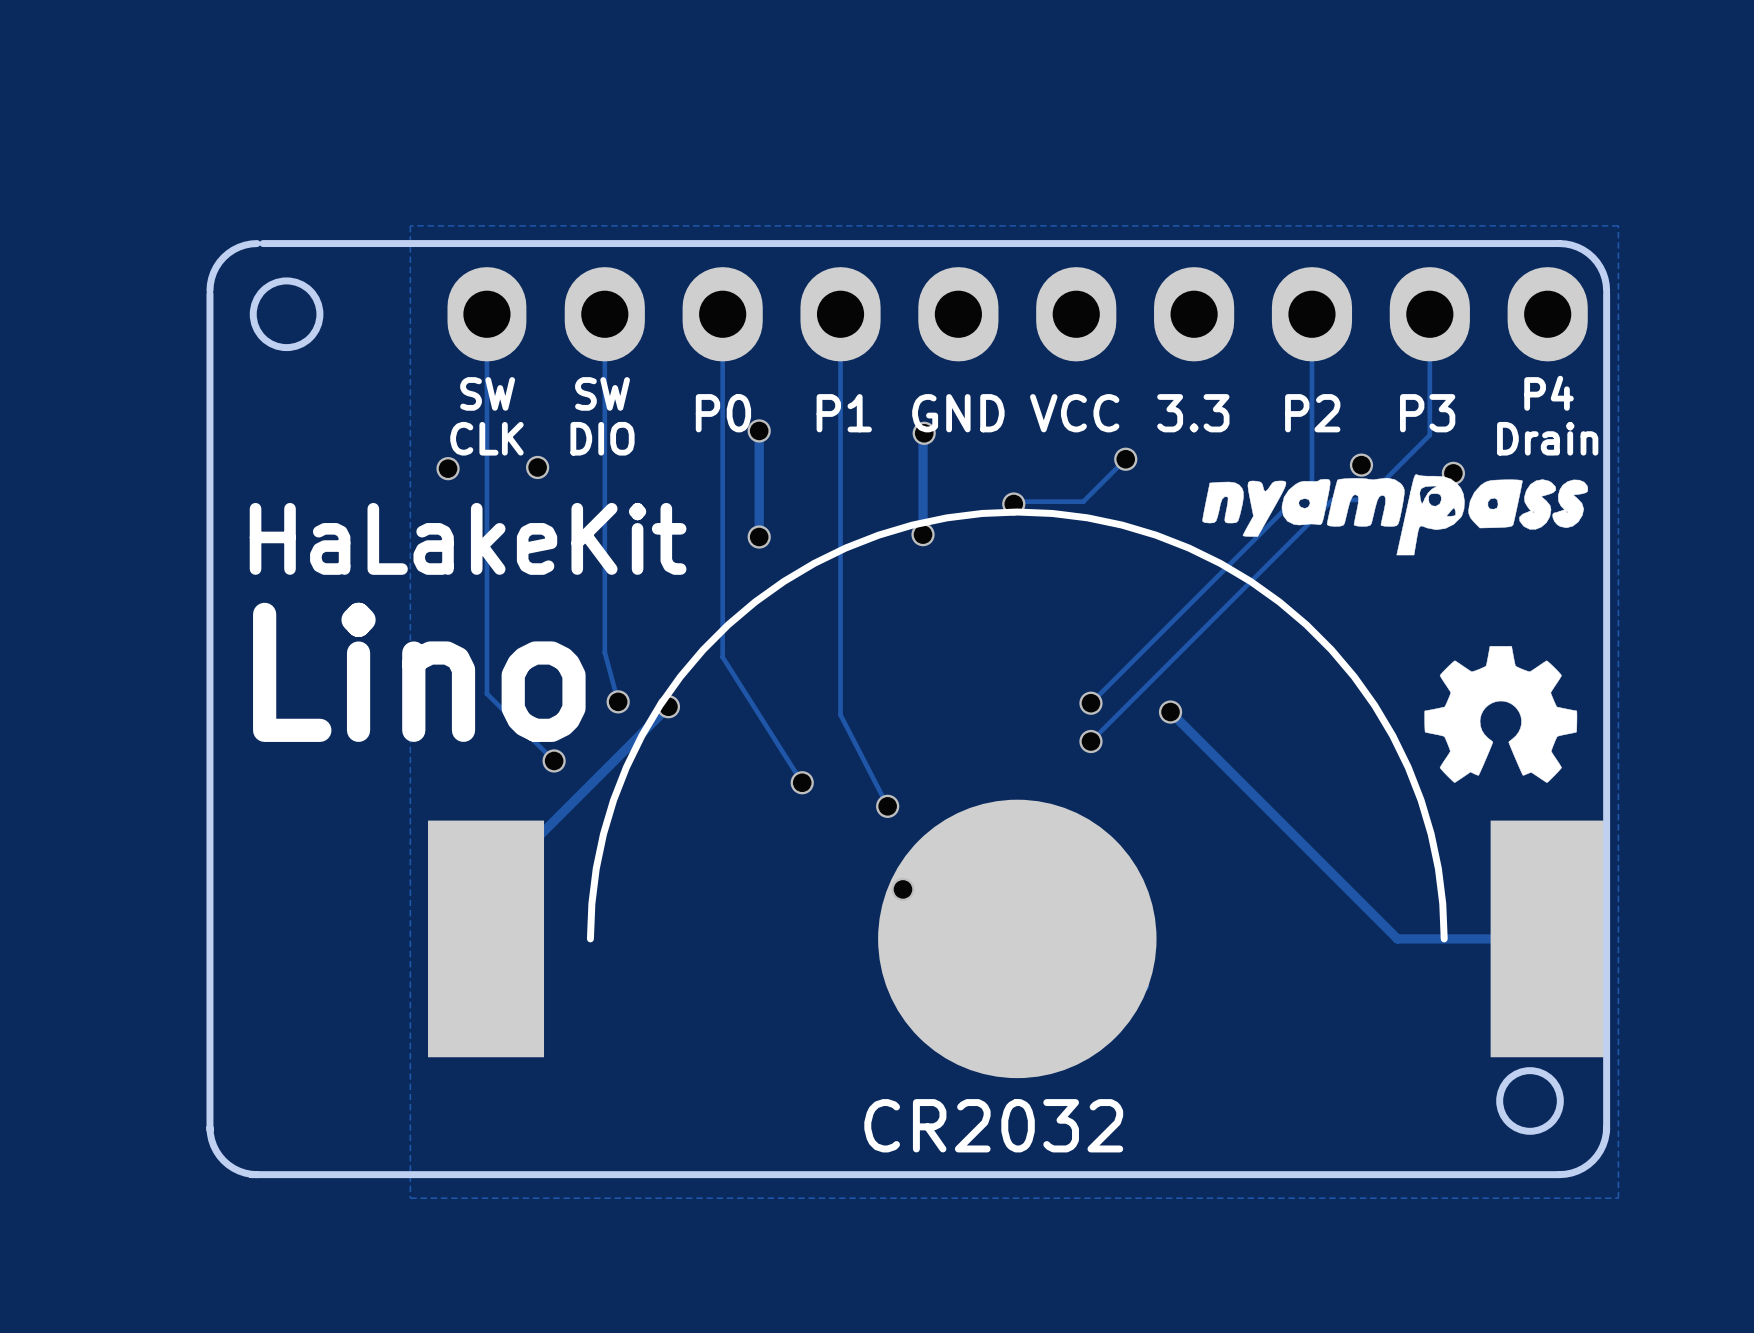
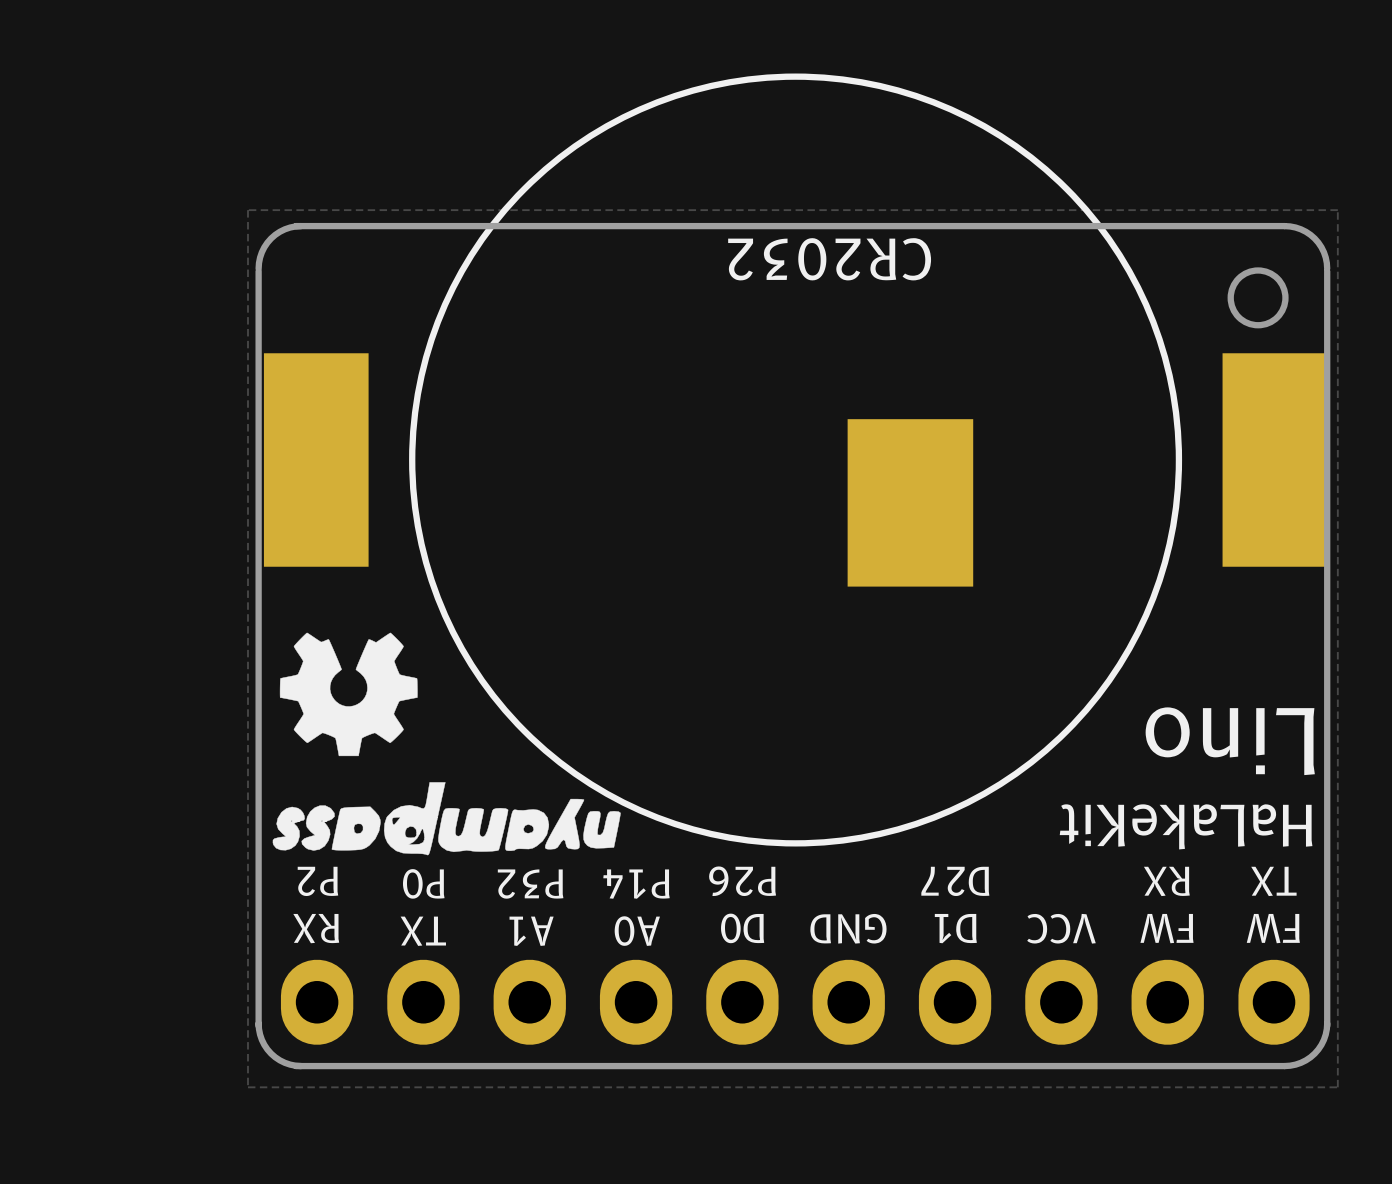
board edge: (257, 243) (239, 247) (223, 257) (213, 272) (209, 290) -> (301, 226) (284, 229) (271, 238) (261, 252) (258, 268)
board edge: (463, 243) (263, 243) -> none
round board edge: [249, 277, 324, 352] -> none
board edge: (209, 293) (209, 1130) -> (258, 271) (258, 1026)
track: (486, 314) (486, 693) (554, 760) -> none
track: (604, 314) (604, 652) (618, 701) -> none
track: (722, 314) (722, 657) (802, 782) -> none
track: (840, 314) (840, 714) (887, 806) -> none
part rotation: 0° (1017, 314) -> 180° (795, 1002)
part position: (1017, 314) -> (795, 1002)
track: (1311, 314) (1311, 482) (1090, 703) -> none
track: (1429, 314) (1429, 435) (1365, 499) (1332, 499) (1090, 741) -> none
text: SW (487, 393) -> none
text: SW (602, 393) -> none
text: P4 (1549, 393) -> none
text rotation: 0° (723, 413) -> 180° (423, 883)
text position: P0 (723, 413) -> P0 (423, 883)
text: P1 (844, 413) -> none
text rotation: 0° (958, 413) -> 180° (848, 928)
text position: GND (958, 413) -> GND (848, 928)
text rotation: 0° (1074, 413) -> 180° (1061, 928)
text position: VCC (1074, 413) -> VCC (1061, 928)
text: 3.3 (1193, 413) -> none
text rotation: 0° (1312, 413) -> 180° (317, 881)
text position: P2 (1312, 413) -> P2 (317, 881)
text: P3 (1427, 413) -> none
track: (759, 430) (759, 537) -> none
via: (759, 430) -> none
track: (924, 433) (923, 534) -> none
via: (924, 433) -> none
text: CLK (486, 438) -> none
text: DIO (602, 438) -> none
text: Drain (1547, 438) -> none
track: (1125, 459) (1083, 501) (1016, 501) (1013, 504) -> none
via: (1125, 459) -> none
via: (1361, 465) -> none
via: (537, 467) -> none
via: (448, 468) -> none
via: (1453, 473) -> none
drawing: [1202, 474, 1589, 556] -> none
part: none -> (795, 460)
via: (1013, 504) -> none
via: (923, 534) -> none
via: (759, 537) -> none
text: HaLakeKit (468, 538) -> none
drawing: [1424, 646, 1578, 783] -> none
text: Lino (419, 672) -> none
drawing: none -> [272, 632, 621, 856]
via: (618, 701) -> none
via: (1090, 703) -> none
track: (668, 706) (486, 889) (486, 938) -> none
via: (668, 706) -> none
track: (1170, 712) (1397, 938) (1548, 938) -> none
via: (1170, 712) -> none
via: (1090, 741) -> none
via: (554, 760) -> none
via: (802, 782) -> none
part: (1017, 793) -> none
via: (887, 806) -> none
text: none -> Lino (1230, 741)
via: (902, 889) -> none
text: none -> HaLakeKit (1186, 826)
text: none -> P26 (742, 881)
text: none -> D27 (955, 881)
text: none -> RX (1166, 881)
text: none -> TX (1273, 881)
text: none -> P32 (530, 884)
text: none -> P14 (636, 884)
text: none -> RX (316, 928)
text: none -> D0 (742, 928)
text: none -> D1 (955, 928)
text: none -> FW (1167, 928)
text: none -> FW (1273, 928)
text: none -> TX (423, 931)
text: none -> A1 (531, 931)
text: none -> A0 (637, 931)
round board edge position: (1530, 1100) -> (1258, 297)
text rotation: 0° (993, 1125) -> 180° (829, 259)
text position: CR2032 (993, 1125) -> CR2032 (829, 259)
board edge: (209, 1127) (213, 1145) (223, 1160) (239, 1171) (257, 1174) -> (258, 1023) (261, 1039) (271, 1053) (284, 1062) (301, 1066)
board edge: (463, 1174) (251, 1174) -> none

